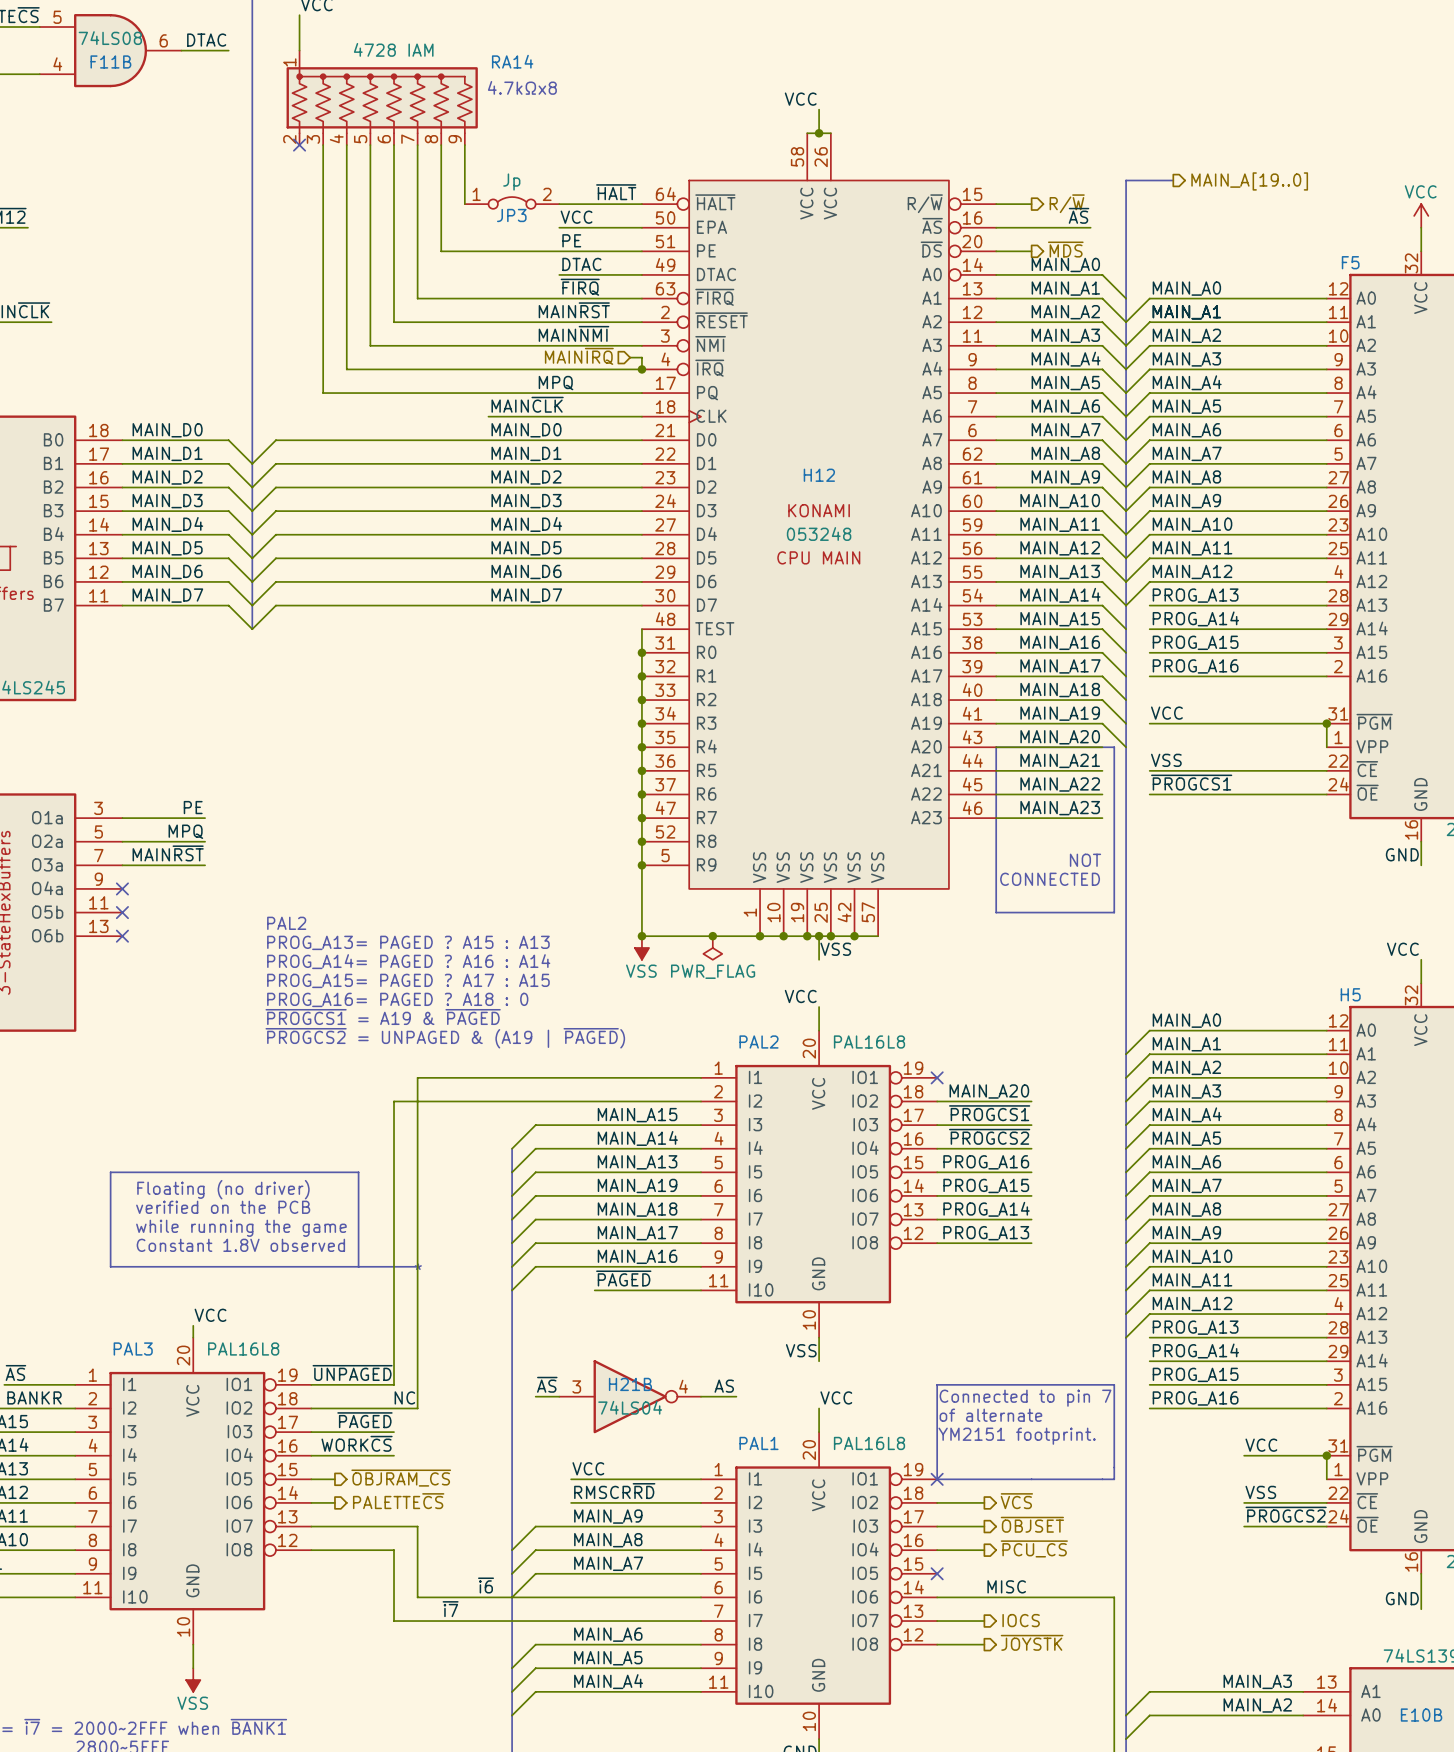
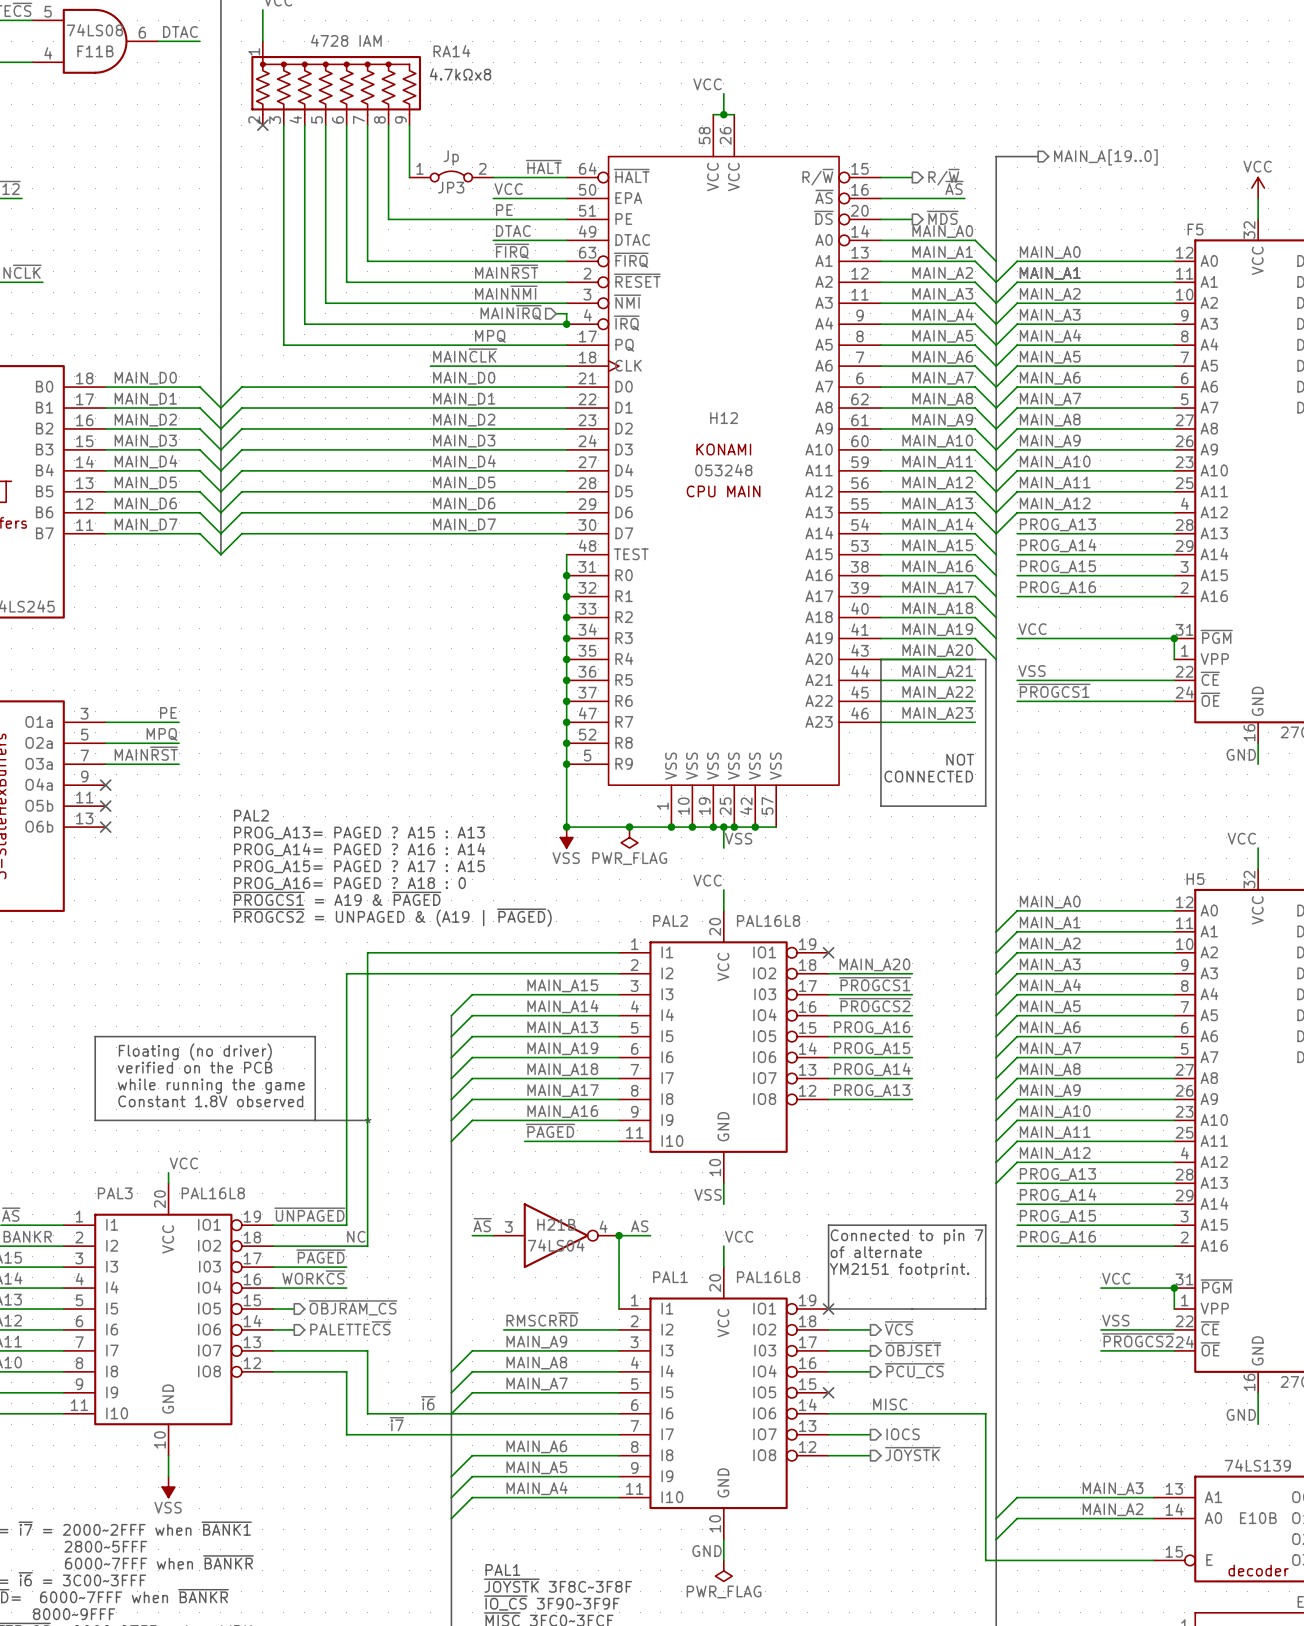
junction: none -> (619, 1235)
label: VCC (588, 1468) -> none
wire: (571, 1479) (701, 1479) -> (619, 1235) (619, 1309)

